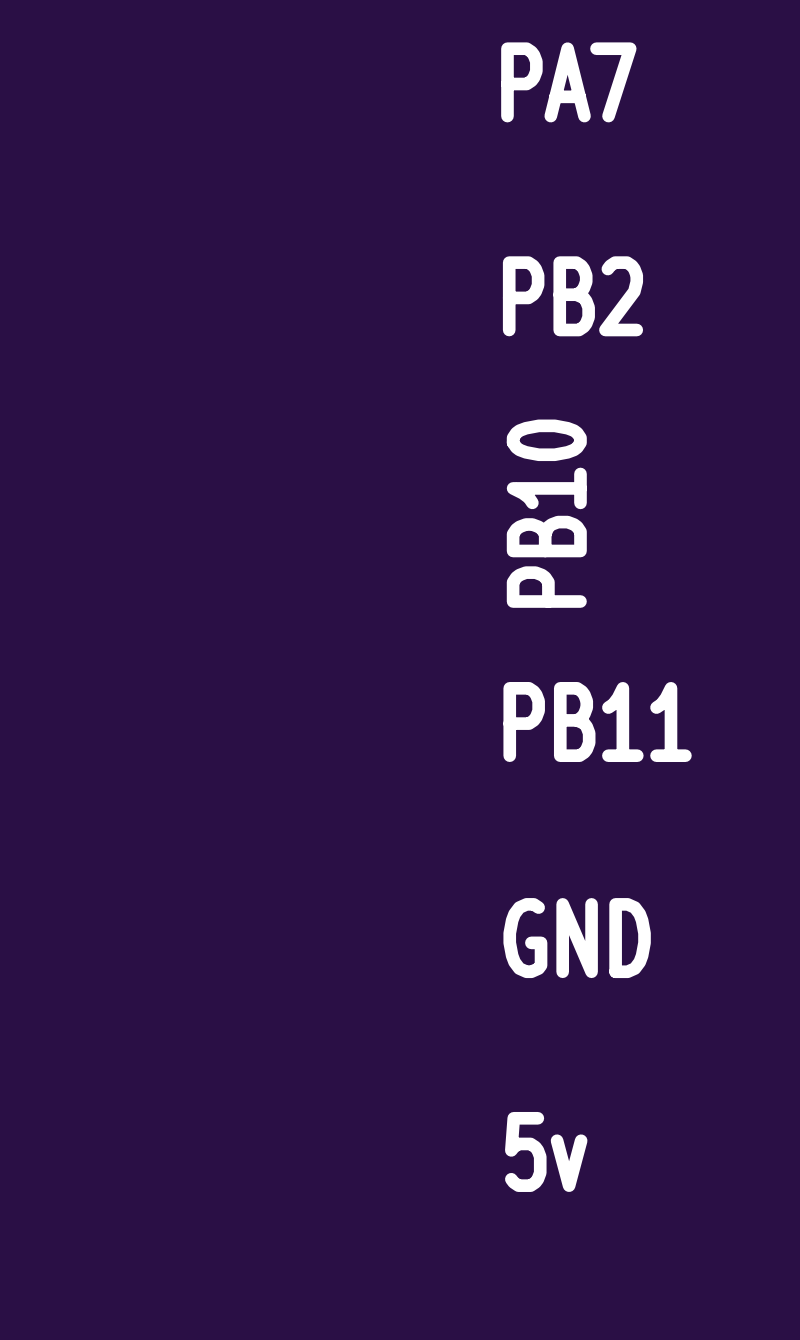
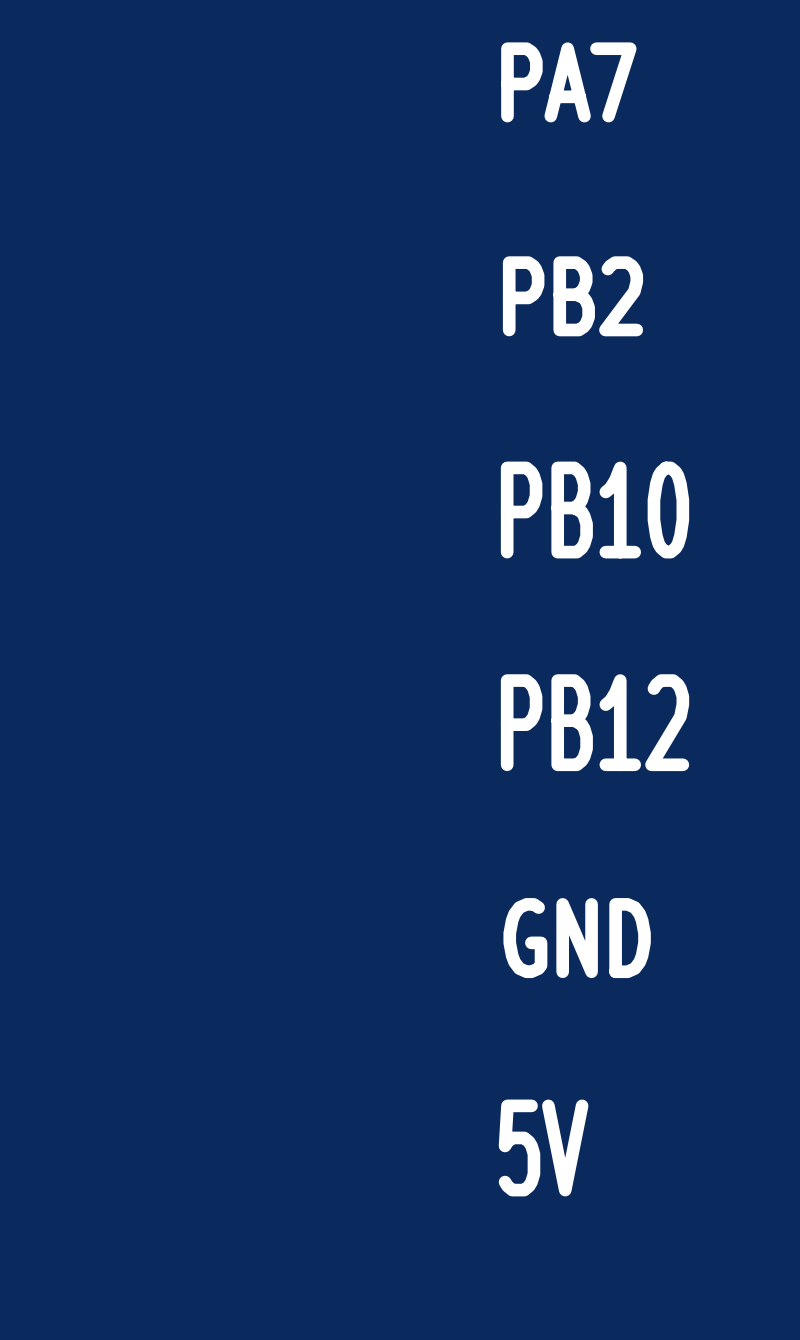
text rotation: 0° (546, 513) -> 90° clockwise (595, 510)
text: PB11 (597, 722) -> PB12 (595, 722)
text: 5v (546, 1151) -> 5V (543, 1147)

